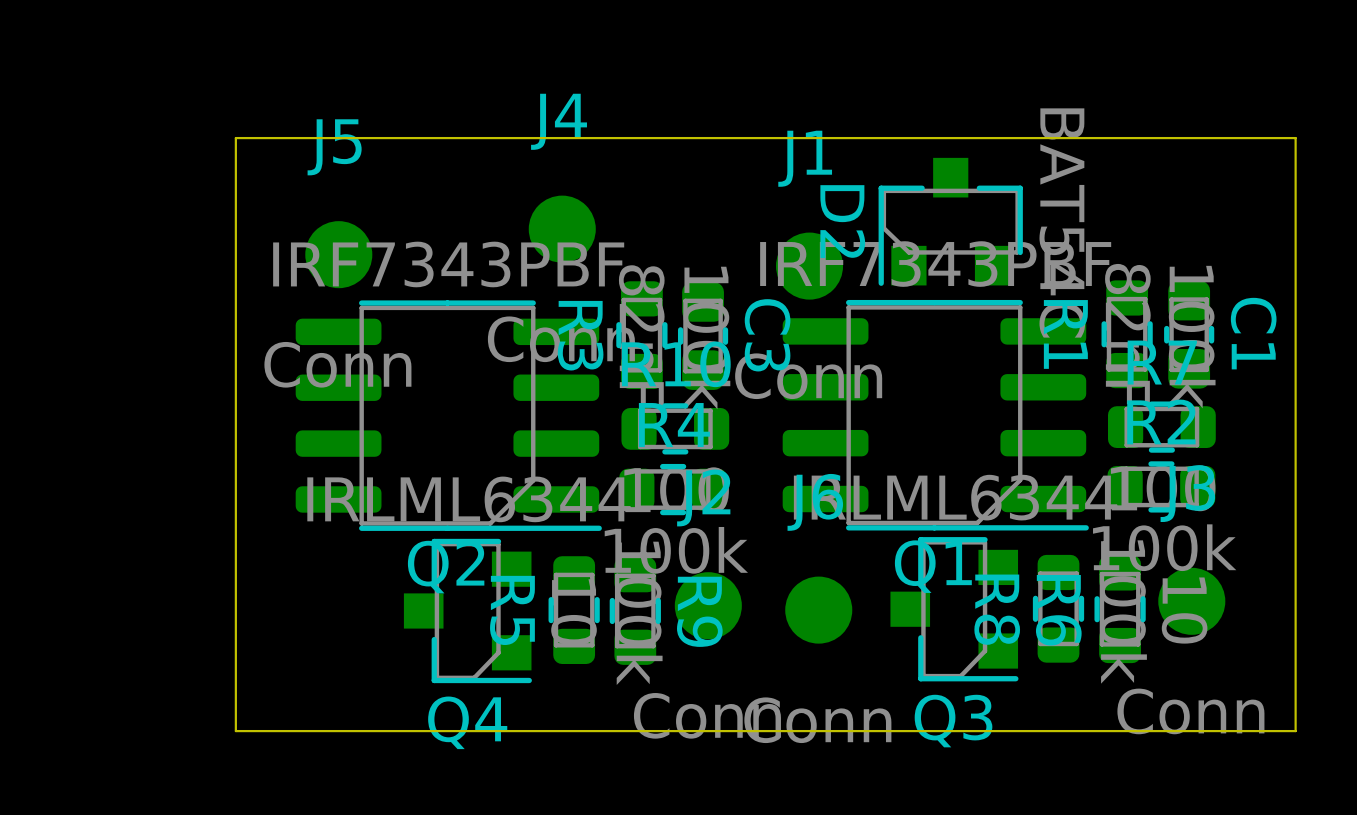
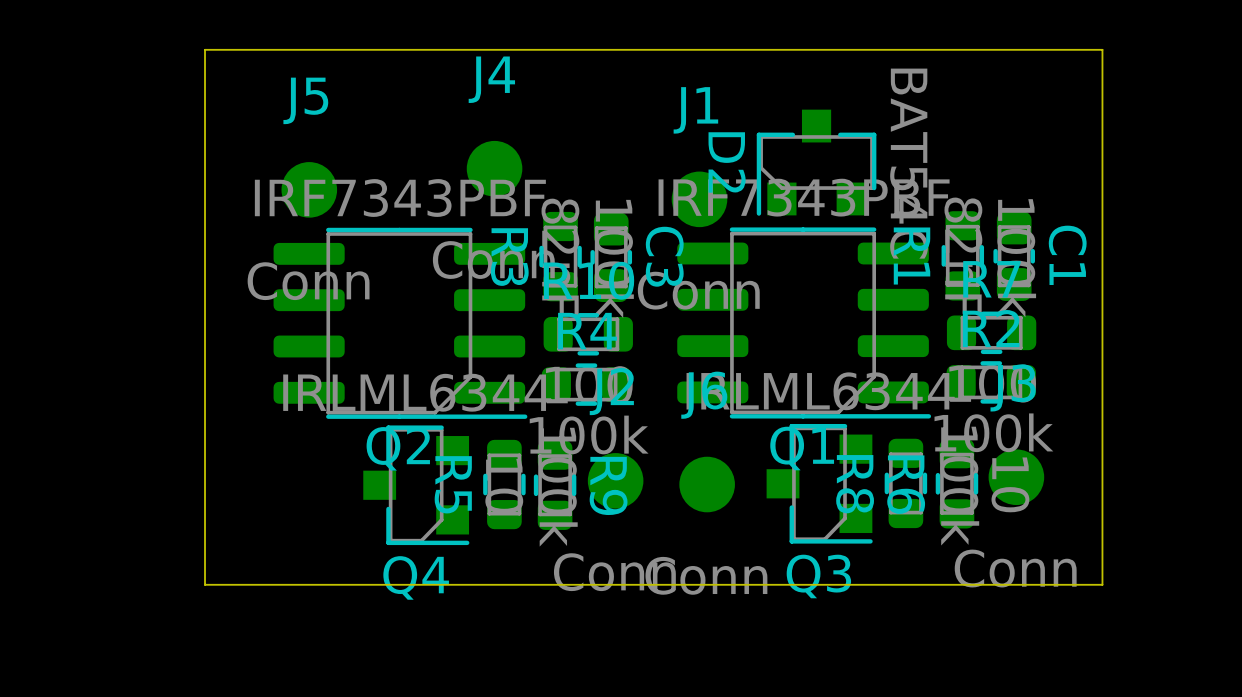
board edge: (1295, 138) (235, 138) (235, 731) -> (1102, 93) (1102, 49) (205, 49) (205, 584) (223, 584)

